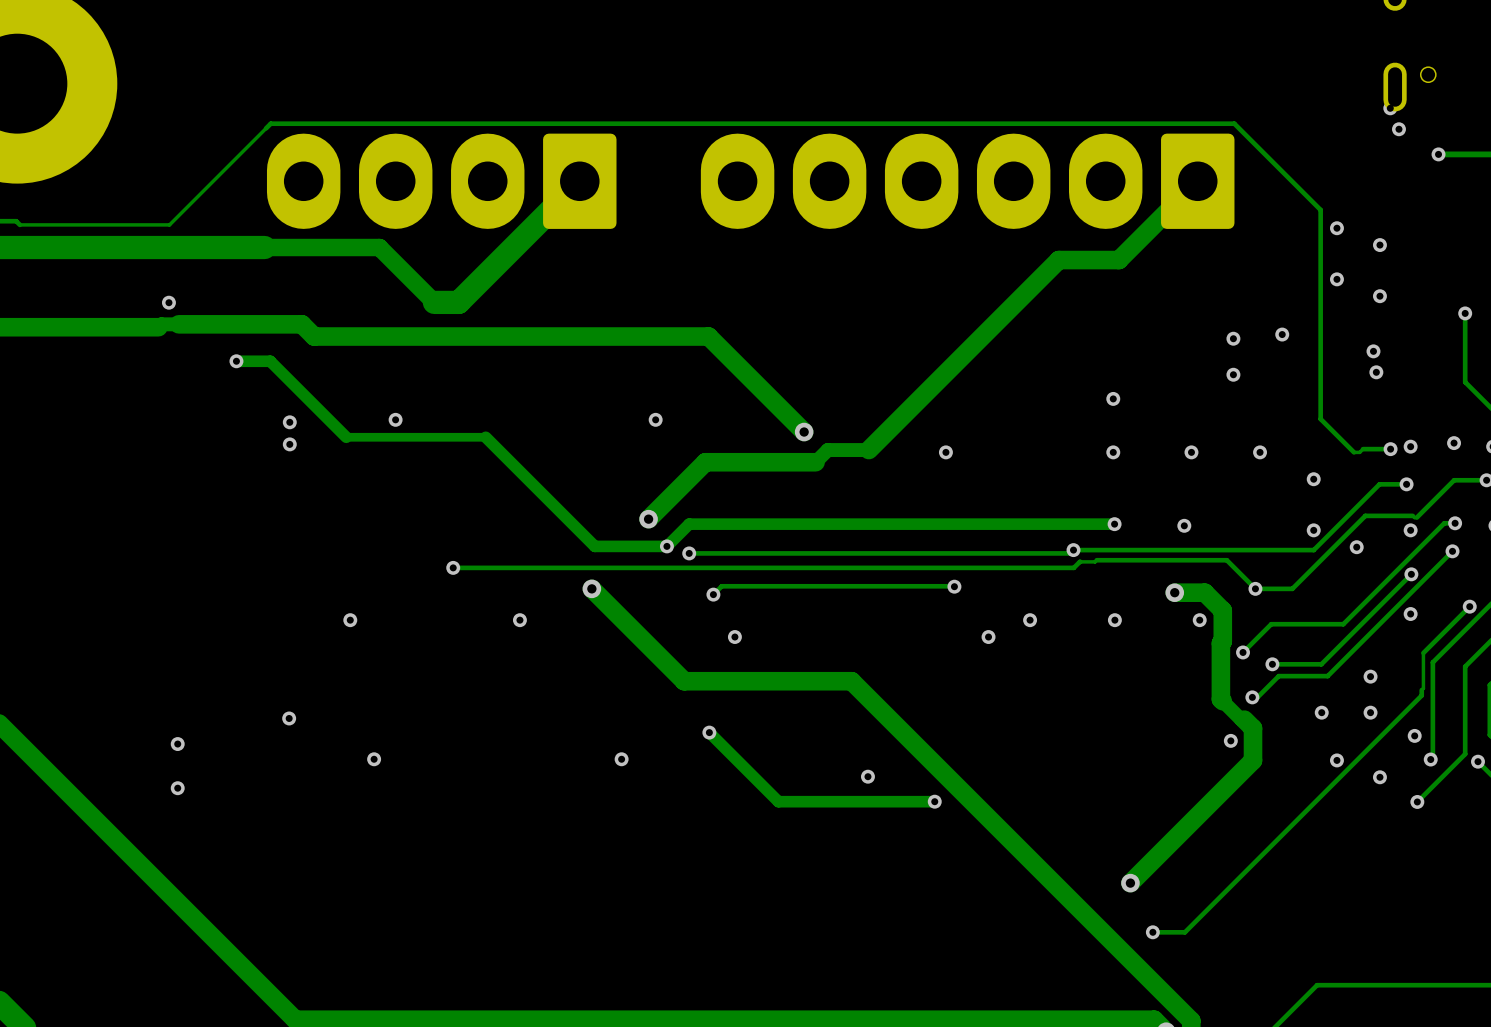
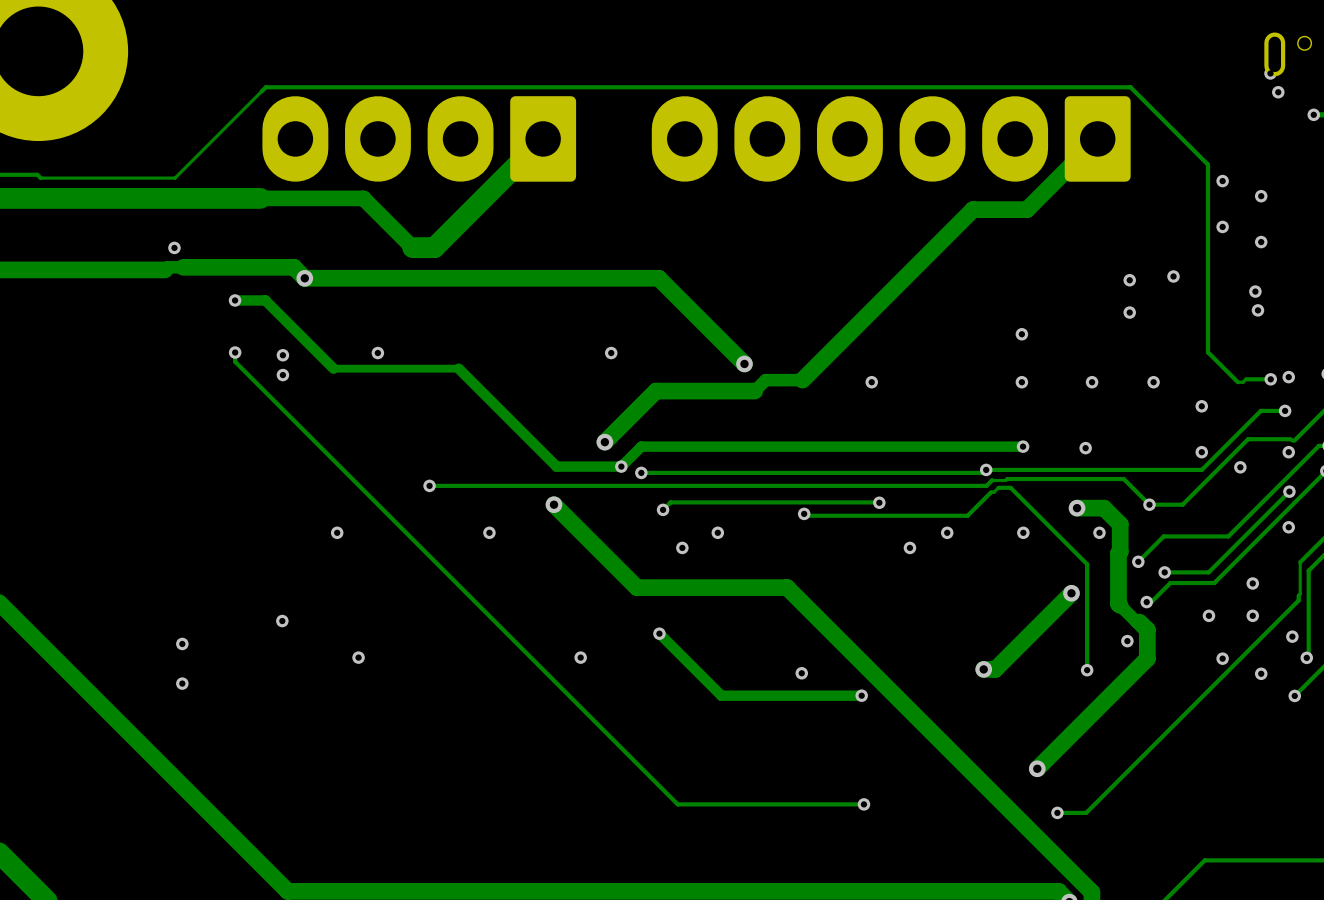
via: none -> (304, 278)
track: none -> (235, 352) (235, 361) (677, 804) (863, 804)
via: none -> (235, 352)
track: none -> (804, 513) (806, 515) (967, 515) (991, 492) (998, 487) (1010, 487) (1087, 564) (1087, 670)
via: none -> (804, 513)
via: none -> (717, 532)
track: none -> (1071, 593) (995, 669) (983, 669)
via: none -> (1071, 593)
via: none -> (983, 669)
via: none -> (1087, 670)
via: none -> (863, 804)

